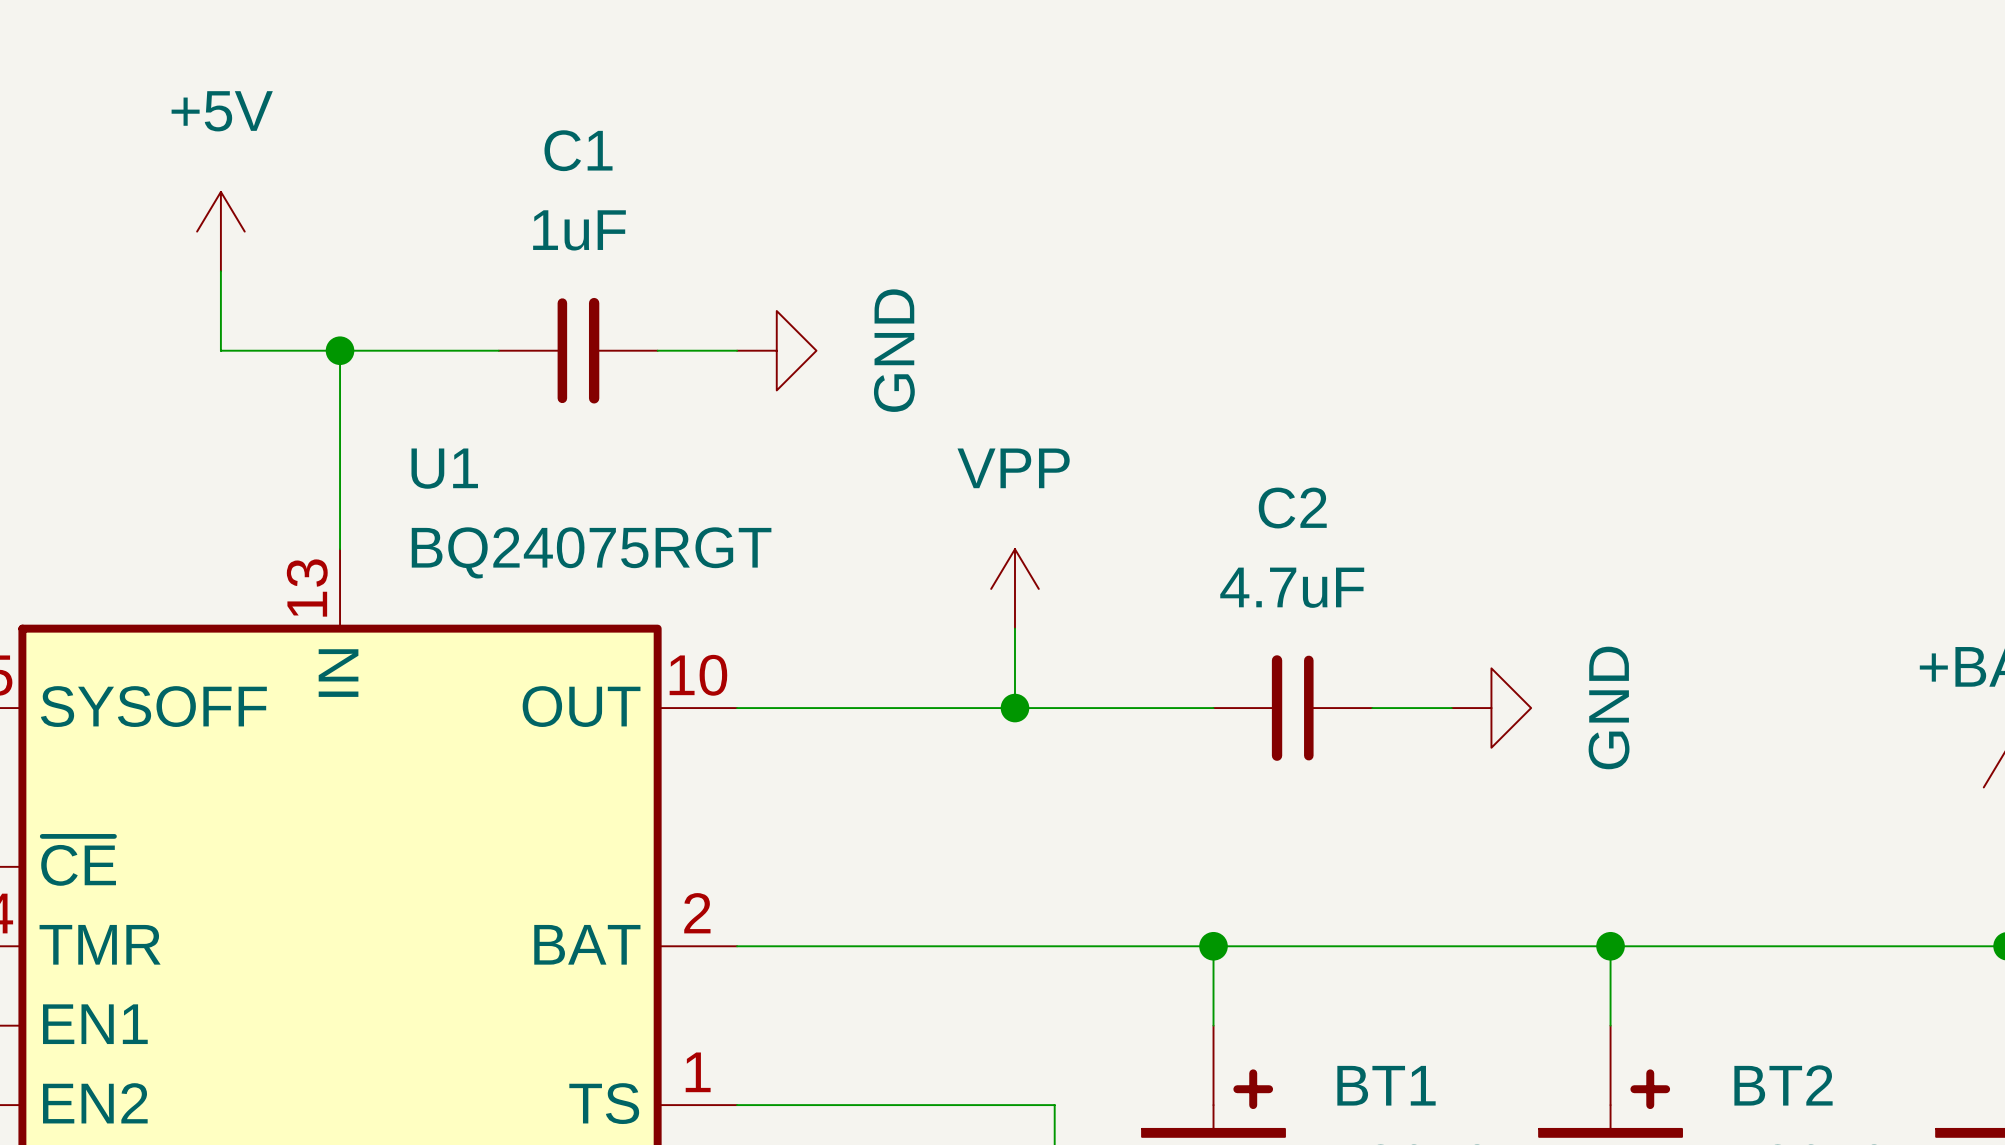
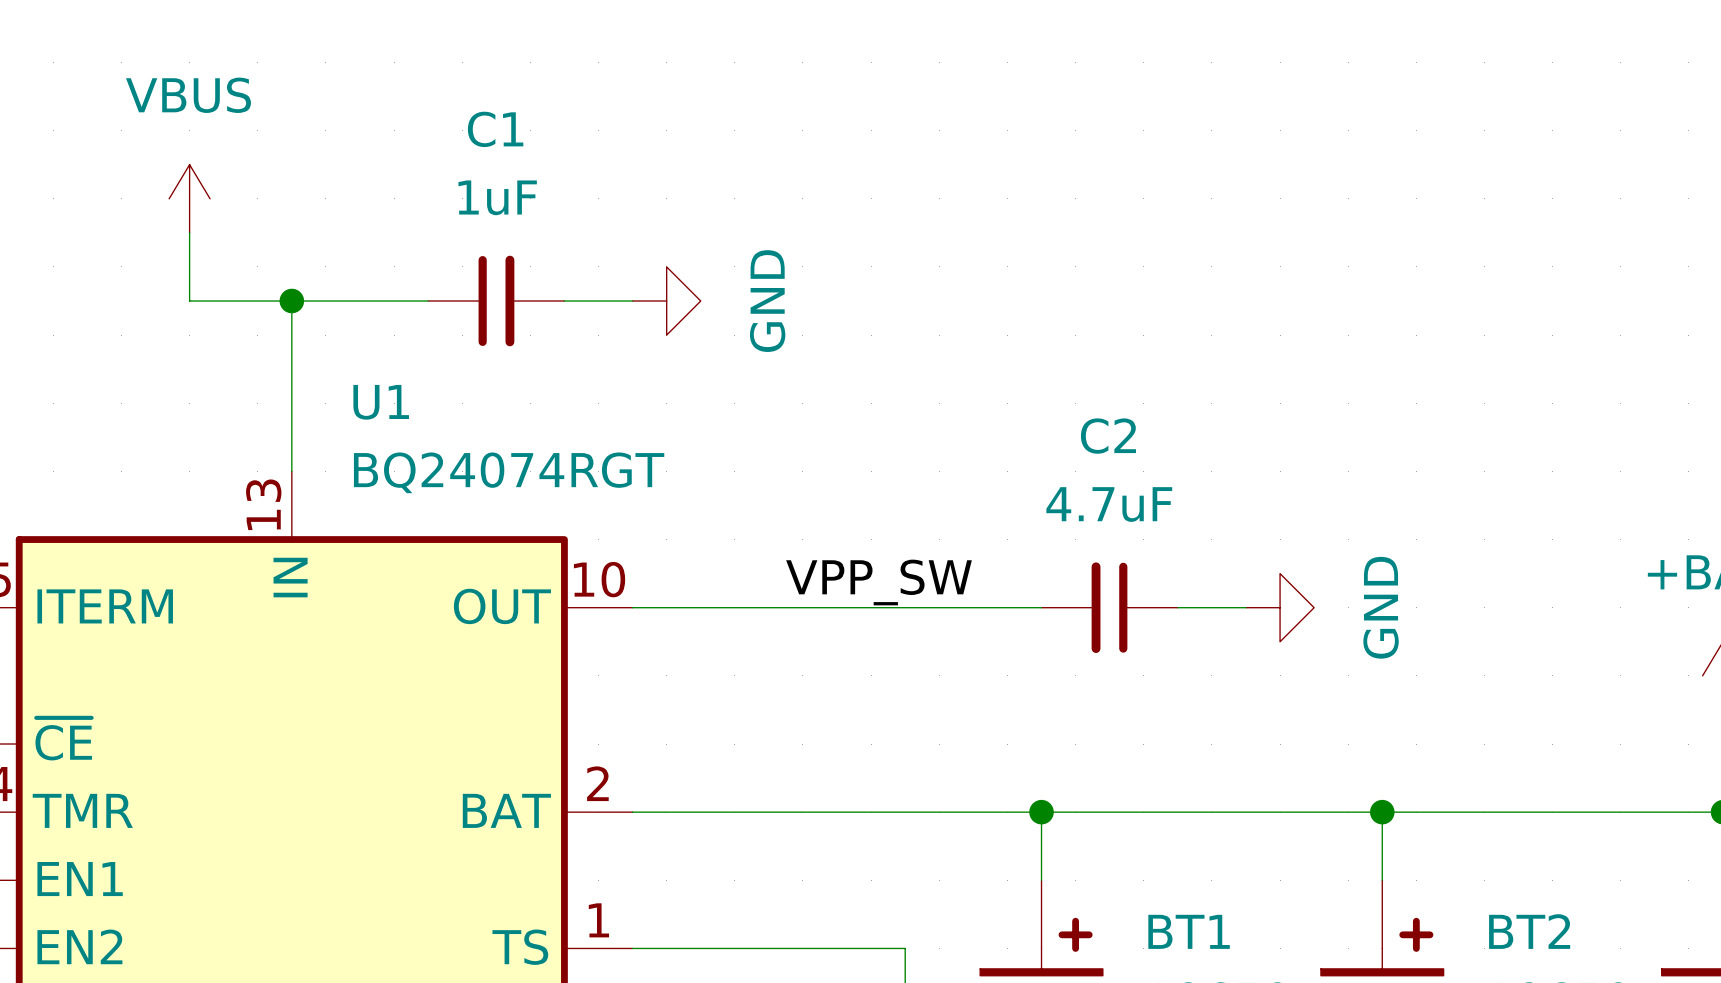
power symbol: +5V (220, 231) -> VBUS (189, 198)
U1 value: BQ24075RGT (591, 552) -> BQ24074RGT (509, 472)
power symbol: VPP (1014, 588) -> none
wire: (1014, 628) (1014, 708) -> none
label: none -> VPP_SW (878, 582)
U1 pin name: SYSOFF (153, 706) -> ITERM (105, 606)
junction: (1014, 708) -> none

